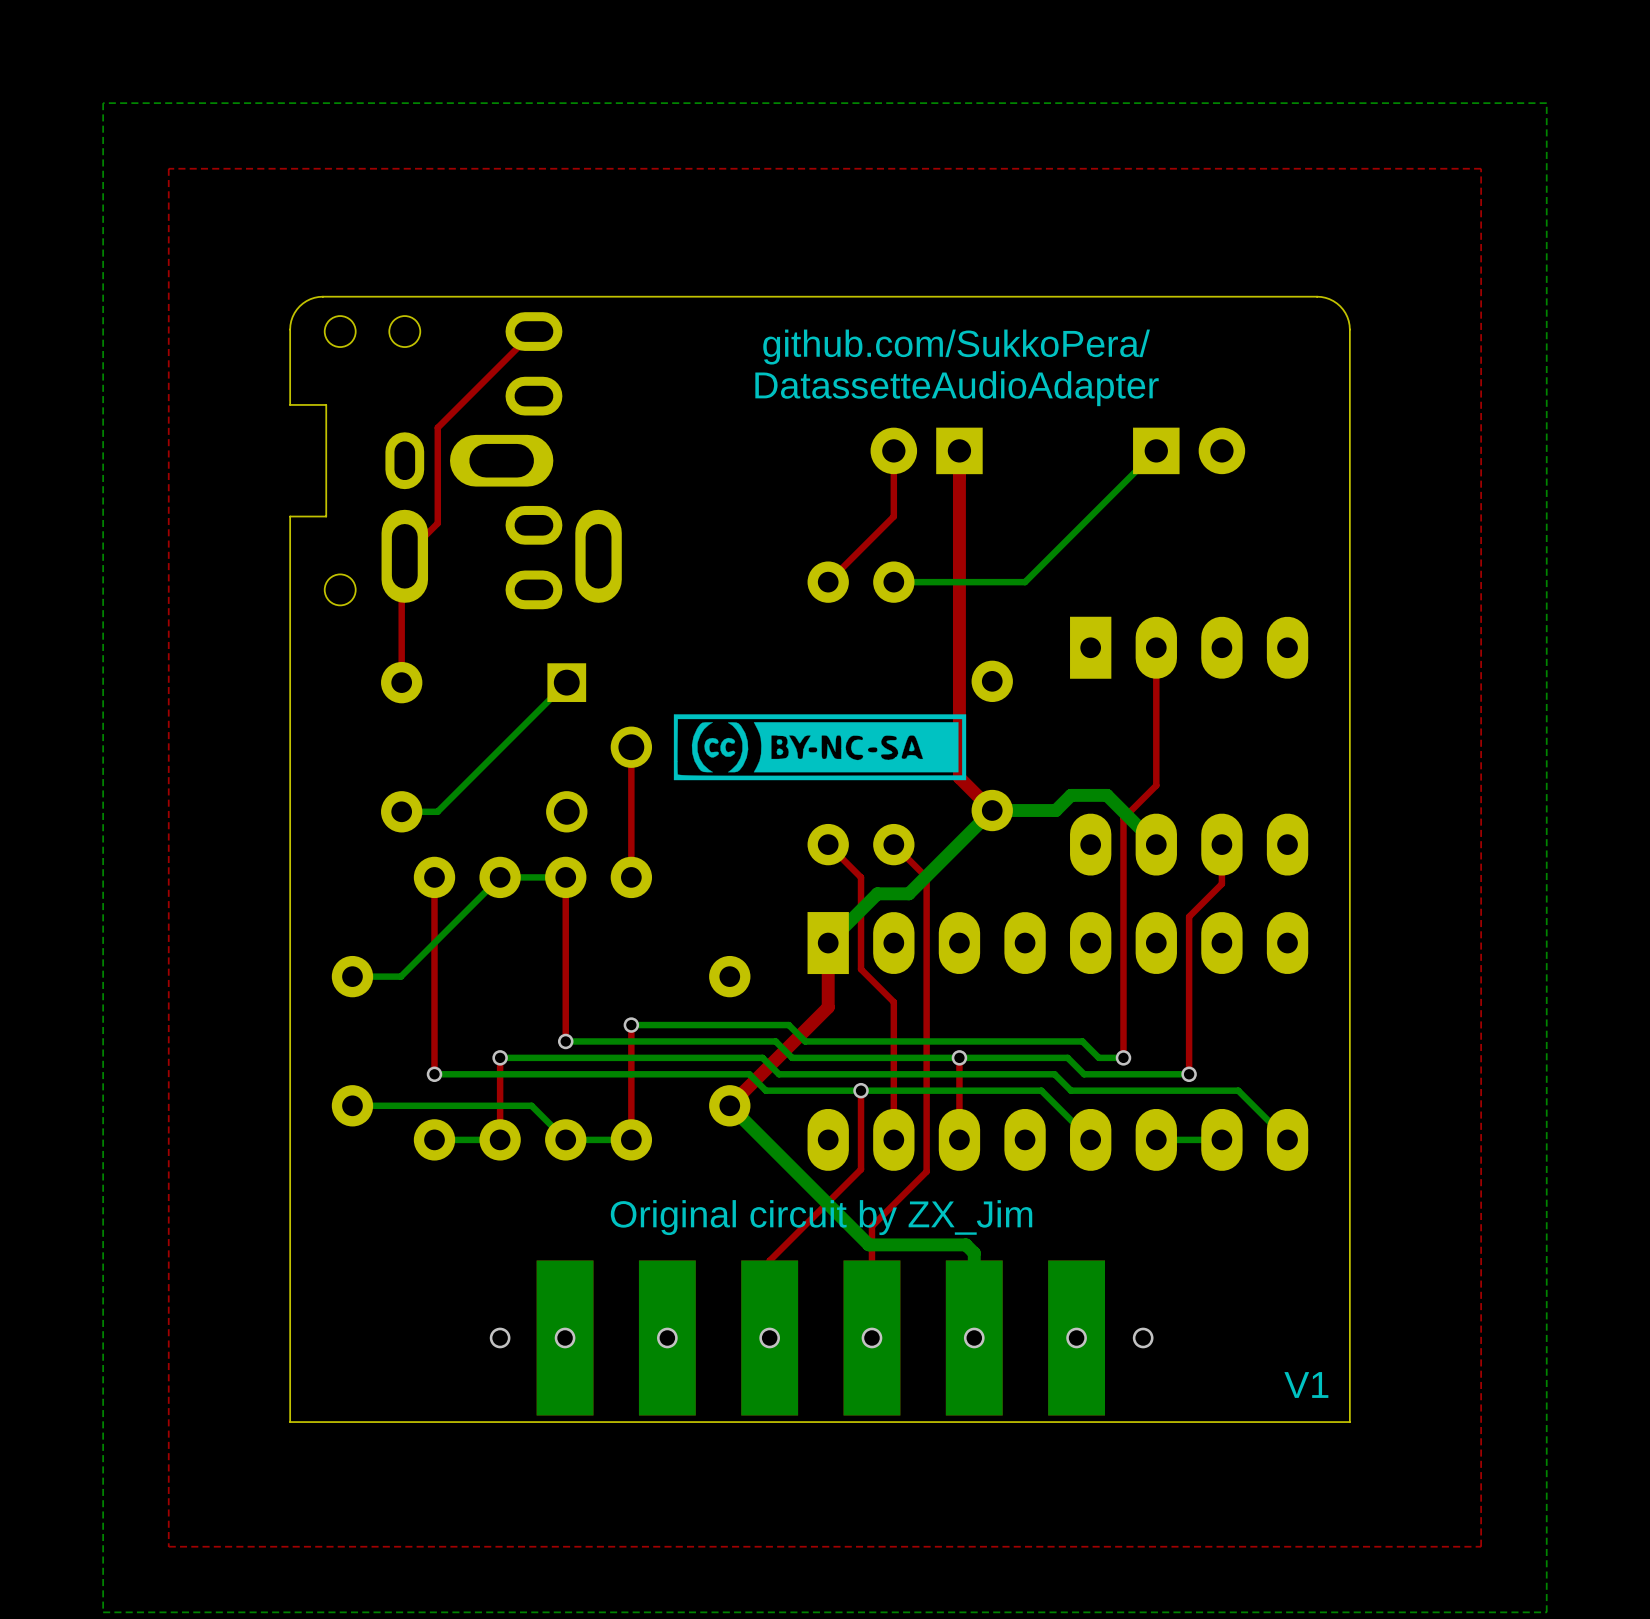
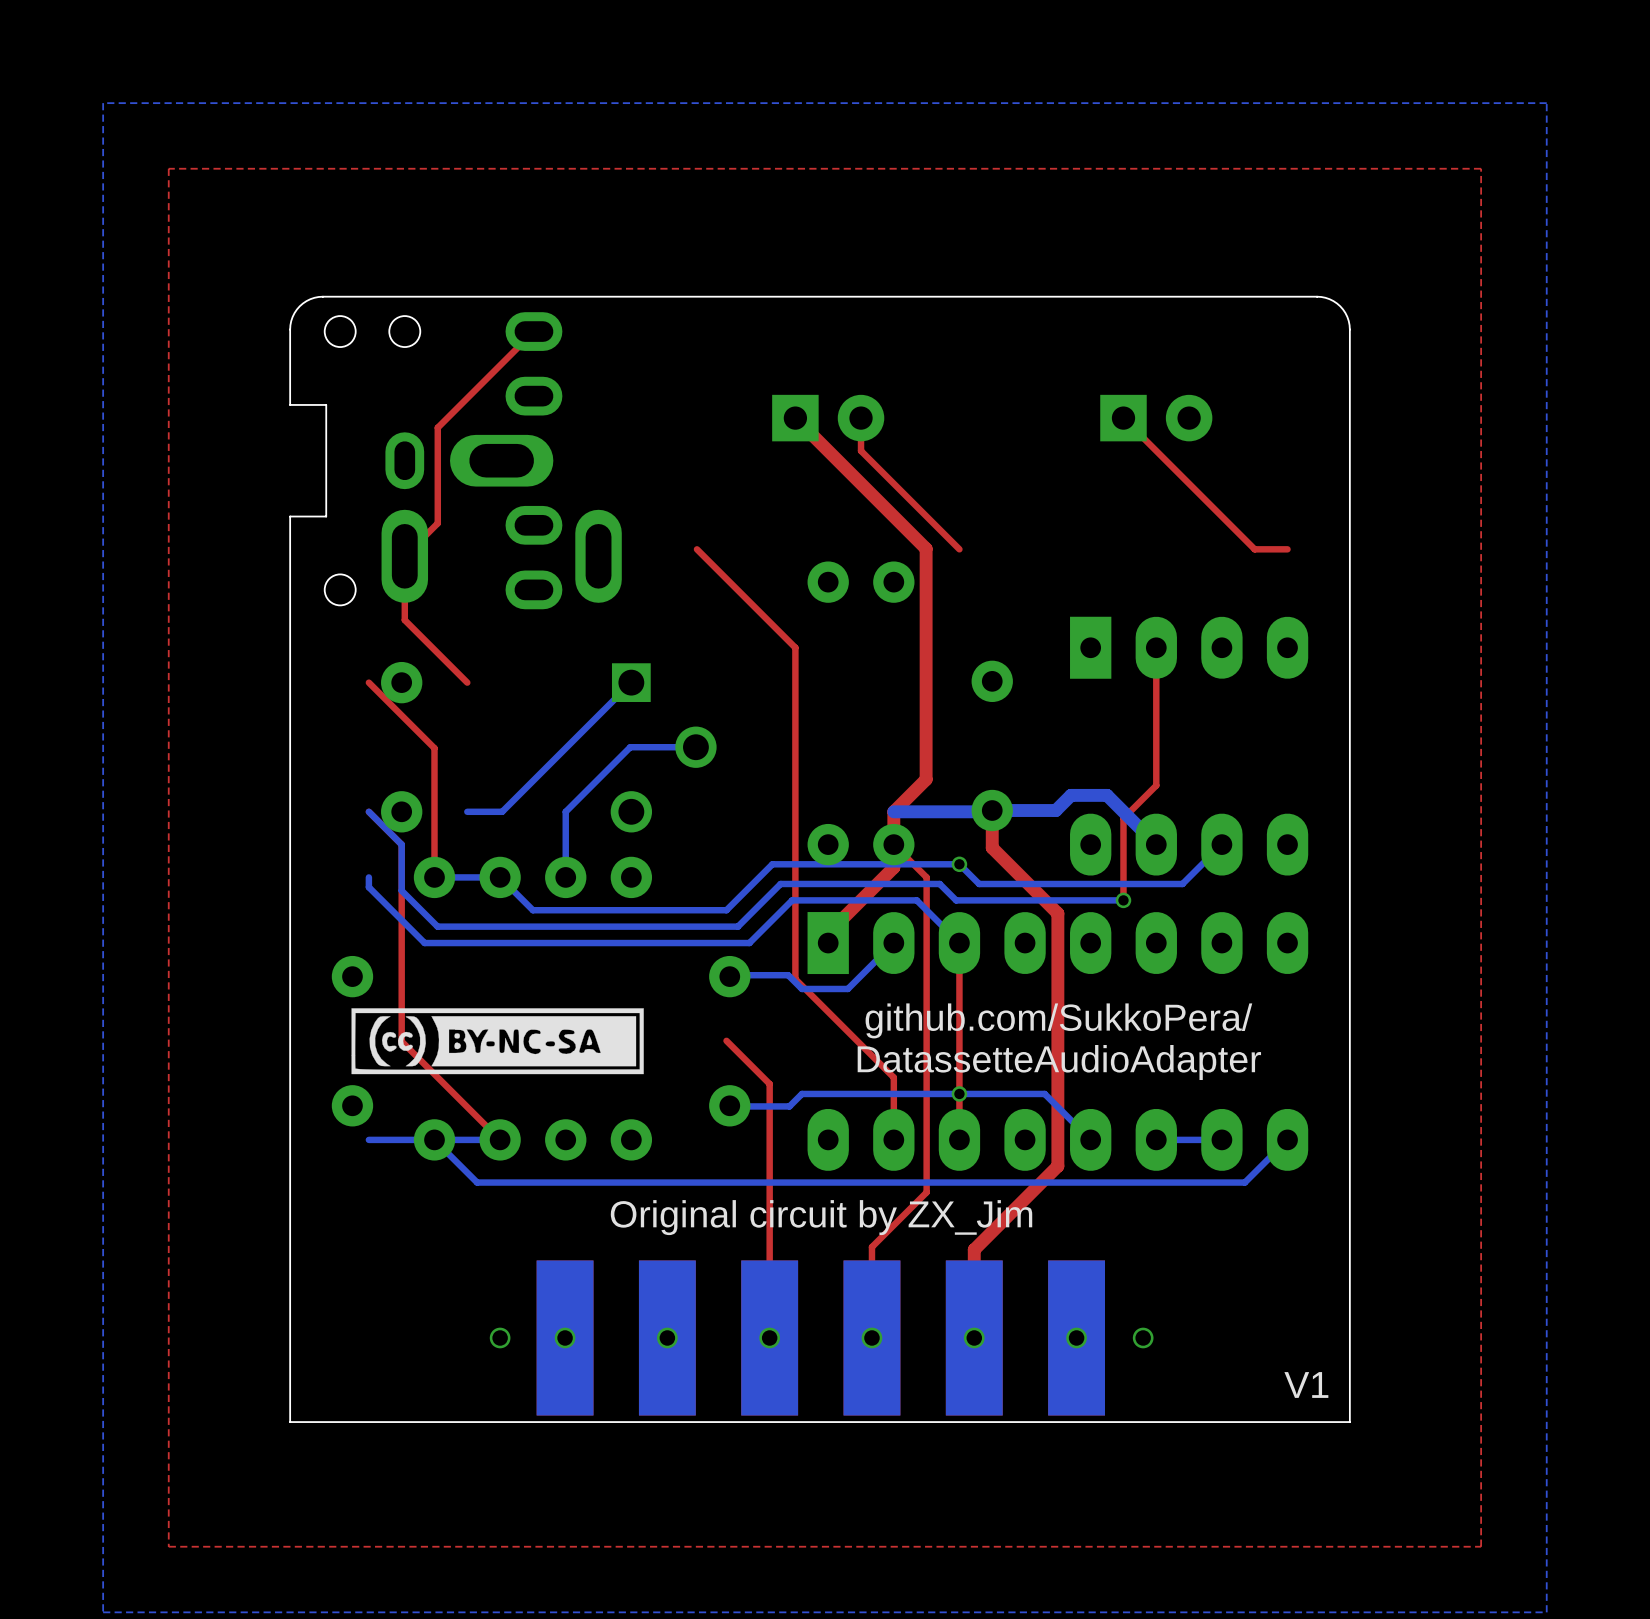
text: github.com/SukkoPera/ (956, 347) -> none
text: DatassetteAudioAdapter (957, 388) -> none
top track: none -> (861, 418) (861, 450) (959, 549)
top track: none -> (1123, 418) (1254, 549) (1287, 549)
top track: (893, 450) (893, 516) (828, 582) -> none
part rotation: 0° (926, 450) -> 180° (828, 418)
part position: (926, 450) -> (828, 418)
top track: (959, 450) (959, 777) (992, 810) -> none
bottom track: (1156, 450) (1025, 582) (893, 582) -> none
part position: (1189, 450) -> (1156, 418)
top track: (404, 556) (401, 559) (401, 682) -> (404, 556) (404, 620) (467, 682)
bottom track: (566, 682) (437, 811) (401, 811) -> none
bottom track: none -> (631, 682) (502, 811) (467, 811)
part position: (599, 747) -> (663, 747)
top track: (631, 747) (631, 877) -> none
drawing position: (820, 747) -> (497, 1041)
bottom track: (992, 810) (908, 893) (877, 893) (828, 943) -> none
bottom track: none -> (368, 811) (401, 844) (401, 890) (437, 926) (737, 926) (780, 883) (939, 883) (956, 900) (1123, 900)
bottom track: none -> (992, 811) (893, 811)
top track: none -> (992, 811) (992, 847) (1057, 913) (1057, 1166) (974, 1249) (974, 1337)
top track: (828, 844) (861, 877) (861, 969) (893, 1002) (893, 1077) -> (696, 549) (795, 647) (795, 979) (893, 1077)
bottom track: none -> (1221, 844) (1182, 884) (979, 884) (959, 864) (772, 864) (726, 910) (532, 910) (500, 877) (434, 877)
top track: (1221, 844) (1221, 883) (1189, 916) (1189, 1074) -> none
via: none -> (959, 864)
bottom track: none -> (368, 877) (368, 887) (424, 943) (749, 943) (792, 900) (916, 900) (959, 943)
top track: (434, 877) (434, 1074) -> (434, 877) (434, 748) (368, 682)
bottom track: (565, 877) (500, 877) (400, 976) (352, 976) -> (565, 877) (565, 811) (630, 747) (695, 747)
top track: (565, 877) (565, 1041) -> none
top track: (1123, 900) (1123, 1057) -> none
via: none -> (1123, 900)
top track: (828, 943) (828, 1007) (729, 1105) -> (828, 943) (828, 933) (893, 867) (893, 811) (926, 779) (926, 548) (795, 418)
bottom track: none -> (893, 943) (847, 988) (801, 988) (788, 975) (726, 975)
text: none -> github.com/SukkoPera/ (1058, 1020)
bottom track: (631, 1025) (788, 1025) (805, 1041) (1082, 1041) (1098, 1057) (1123, 1057) -> none
top track: (631, 1025) (631, 1139) -> (959, 943) (959, 1057)
via: (631, 1025) -> none
bottom track: (565, 1041) (775, 1041) (792, 1057) (1067, 1057) (1084, 1074) (1189, 1074) -> none
via: (565, 1041) -> none
bottom track: (500, 1057) (762, 1057) (778, 1074) (1054, 1074) (1070, 1090) (1238, 1090) (1287, 1139) -> (368, 1139) (434, 1139) (477, 1182) (1244, 1182) (1287, 1139)
top track: (500, 1057) (500, 1139) -> (368, 811) (401, 844) (401, 1041) (500, 1139)
via: (500, 1057) -> none
via position: (959, 1057) -> (959, 1093)
via: (1123, 1057) -> none
text: none -> DatassetteAudioAdapter (1059, 1062)
bottom track: (434, 1074) (749, 1074) (765, 1090) (1041, 1090) (1044, 1093) -> (726, 1106) (789, 1106) (801, 1093) (1044, 1093)
via: (434, 1074) -> none
via: (1189, 1074) -> none
top track: (861, 1090) (861, 1169) (769, 1260) -> (726, 1040) (769, 1083) (769, 1260)
via: (861, 1090) -> none
bottom track: (352, 1105) (531, 1105) (565, 1139) (631, 1139) -> none
bottom track: (729, 1105) (868, 1244) (966, 1244) (974, 1253) (974, 1337) -> none
top track: (926, 1171) (871, 1226) (871, 1247) -> (926, 1171) (926, 1192) (871, 1247)

